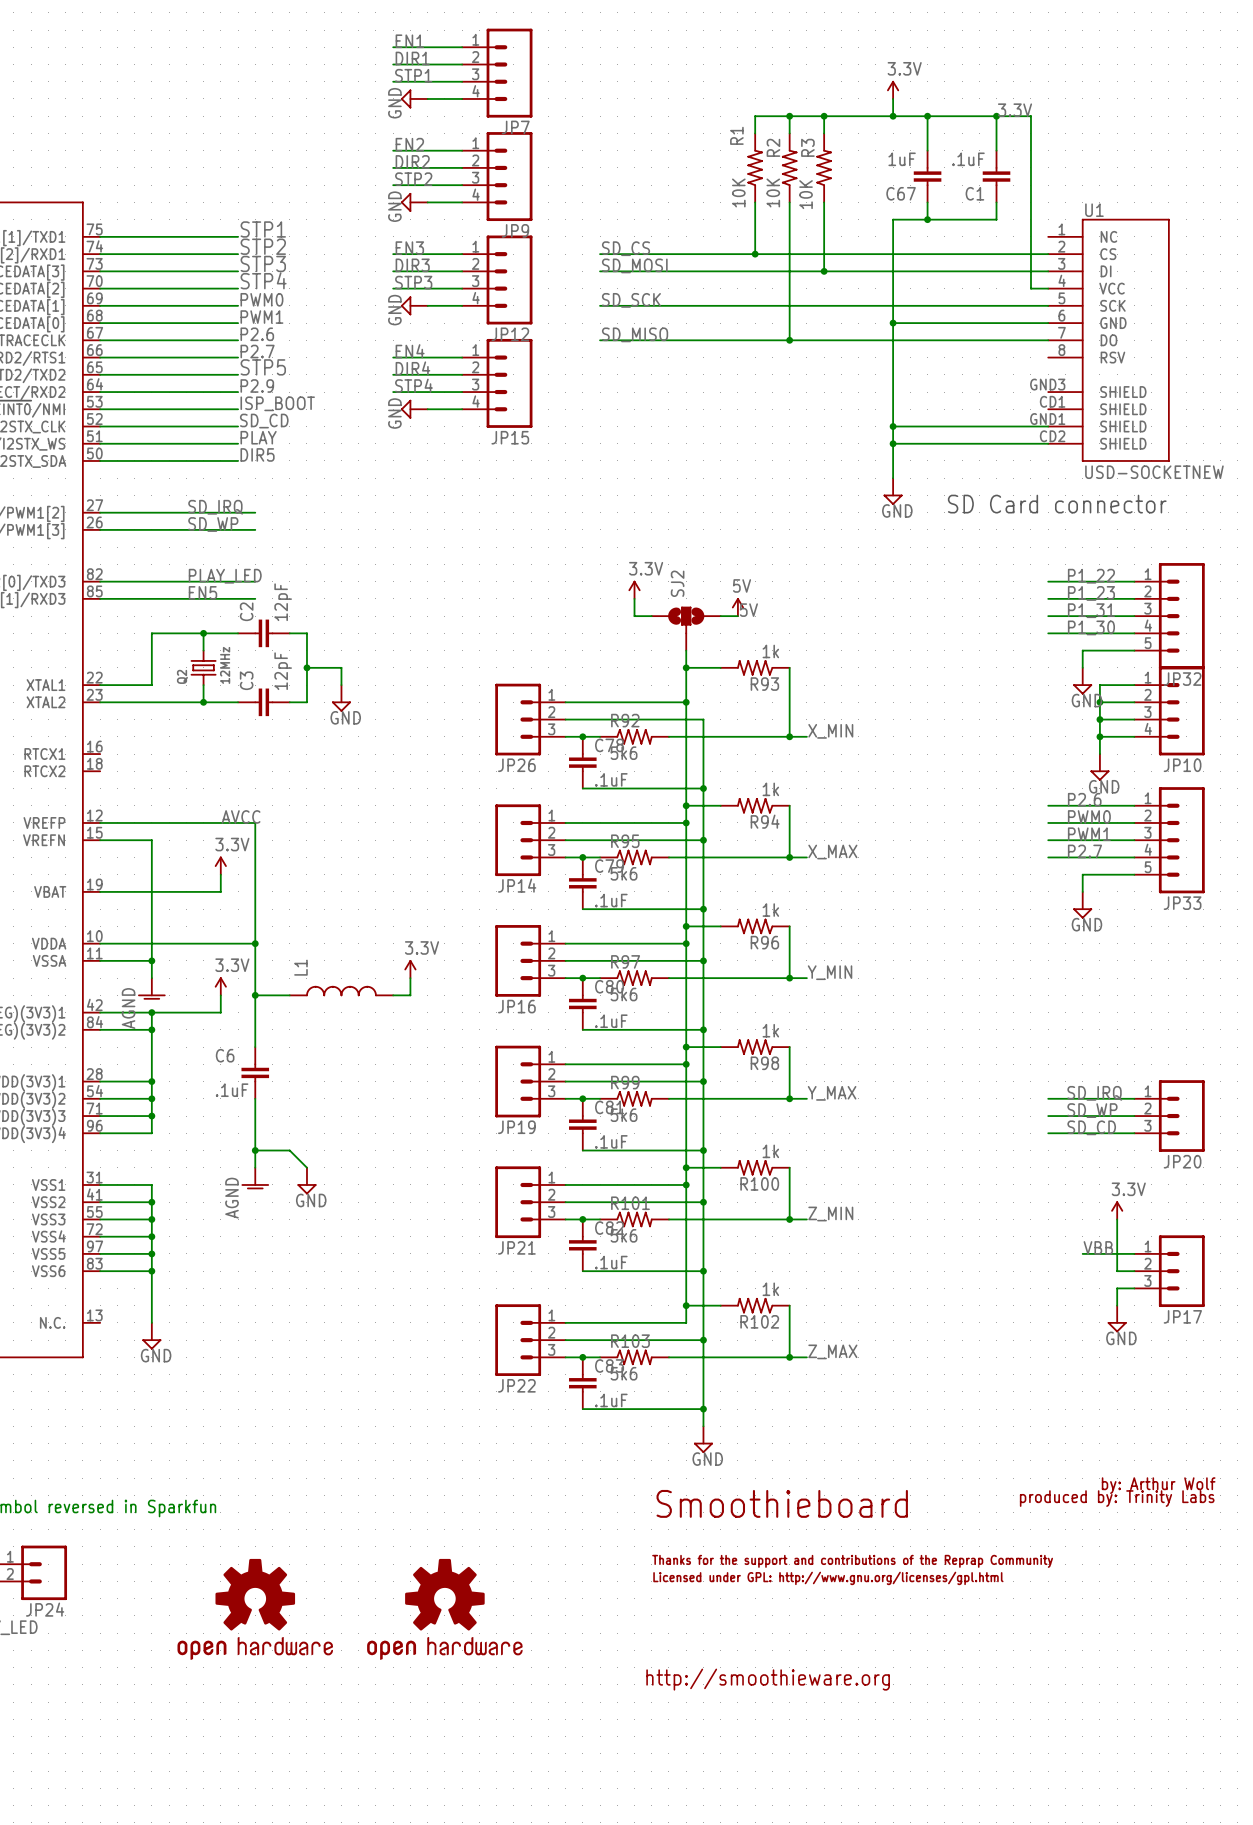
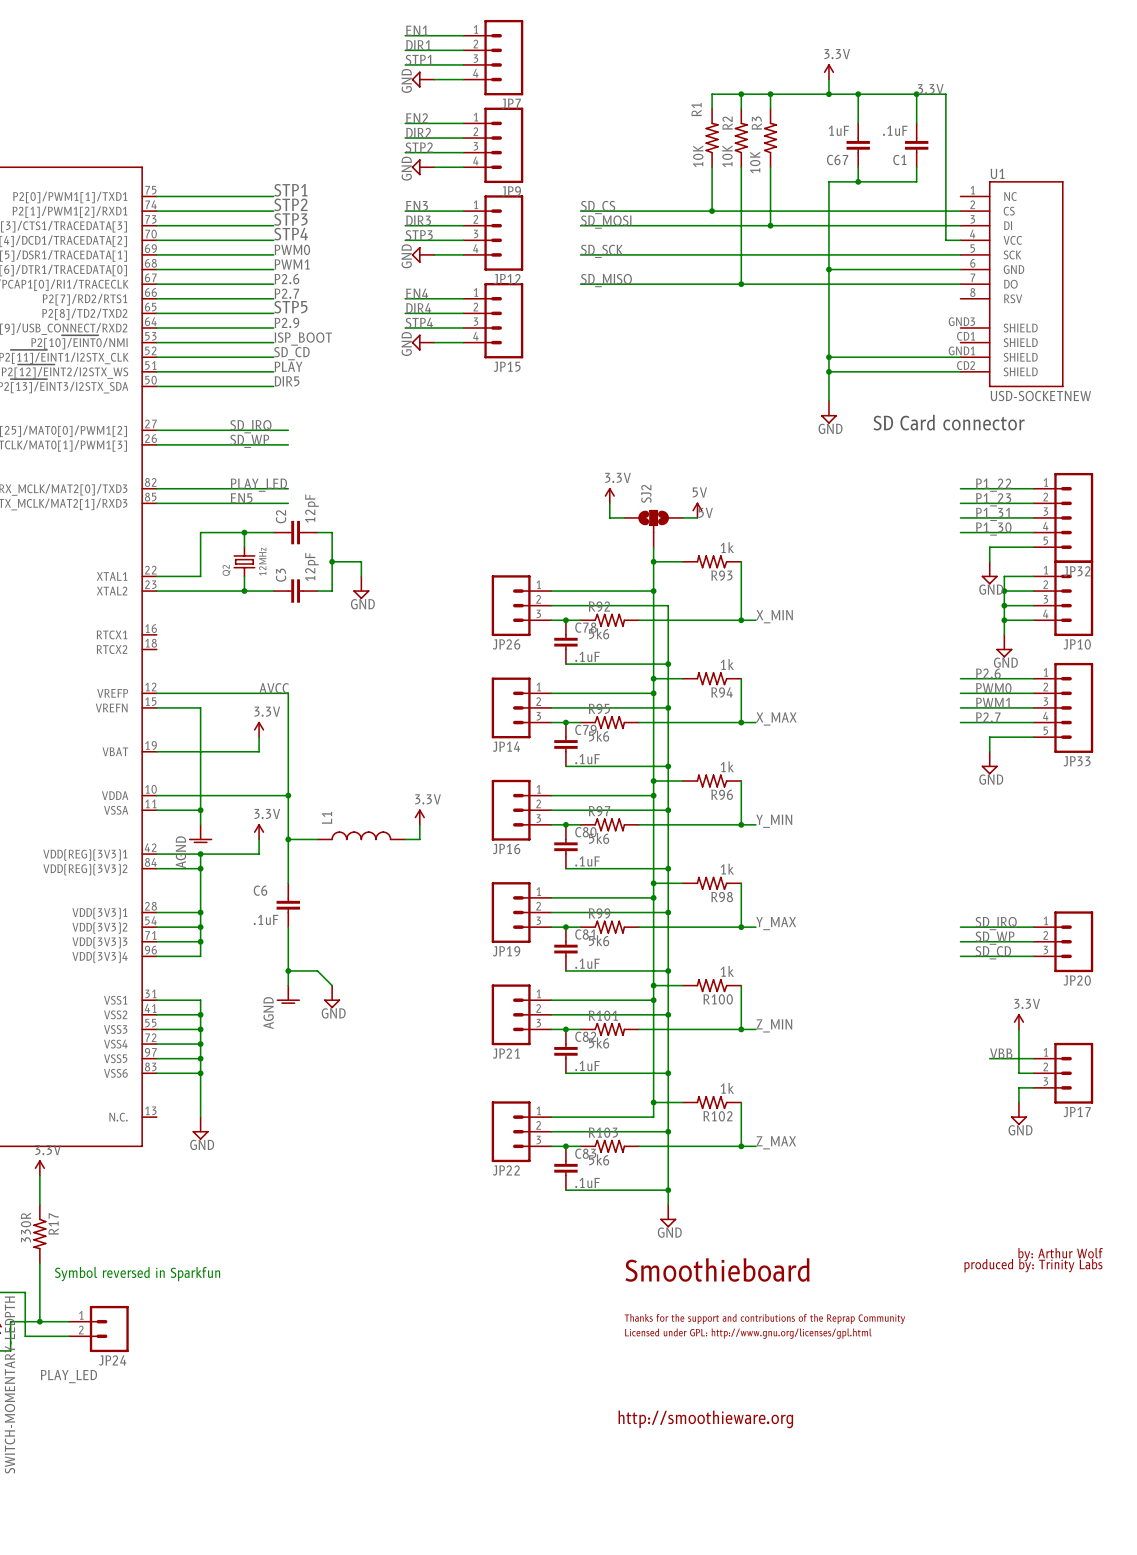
part: (255, 1609) -> none
part: (444, 1609) -> none

